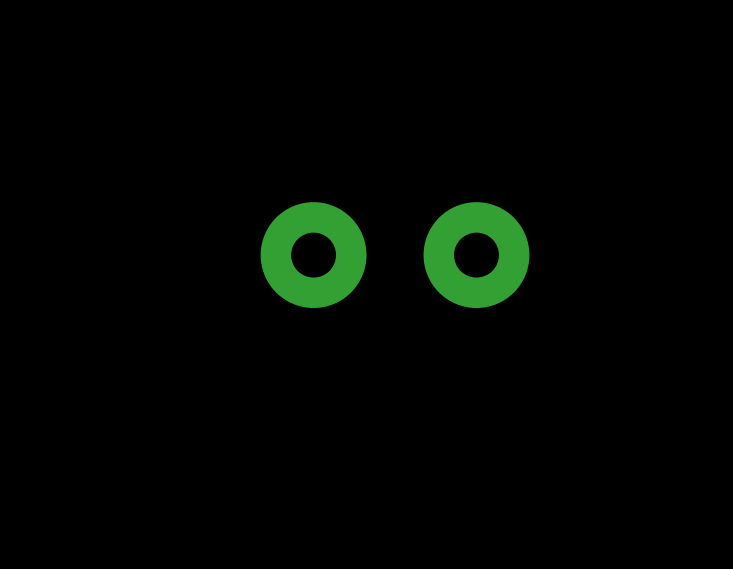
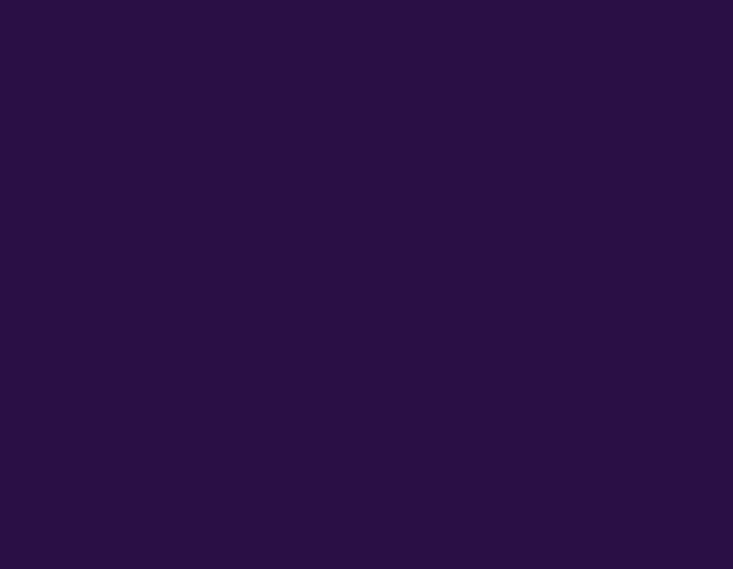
part: (395, 255) -> none

